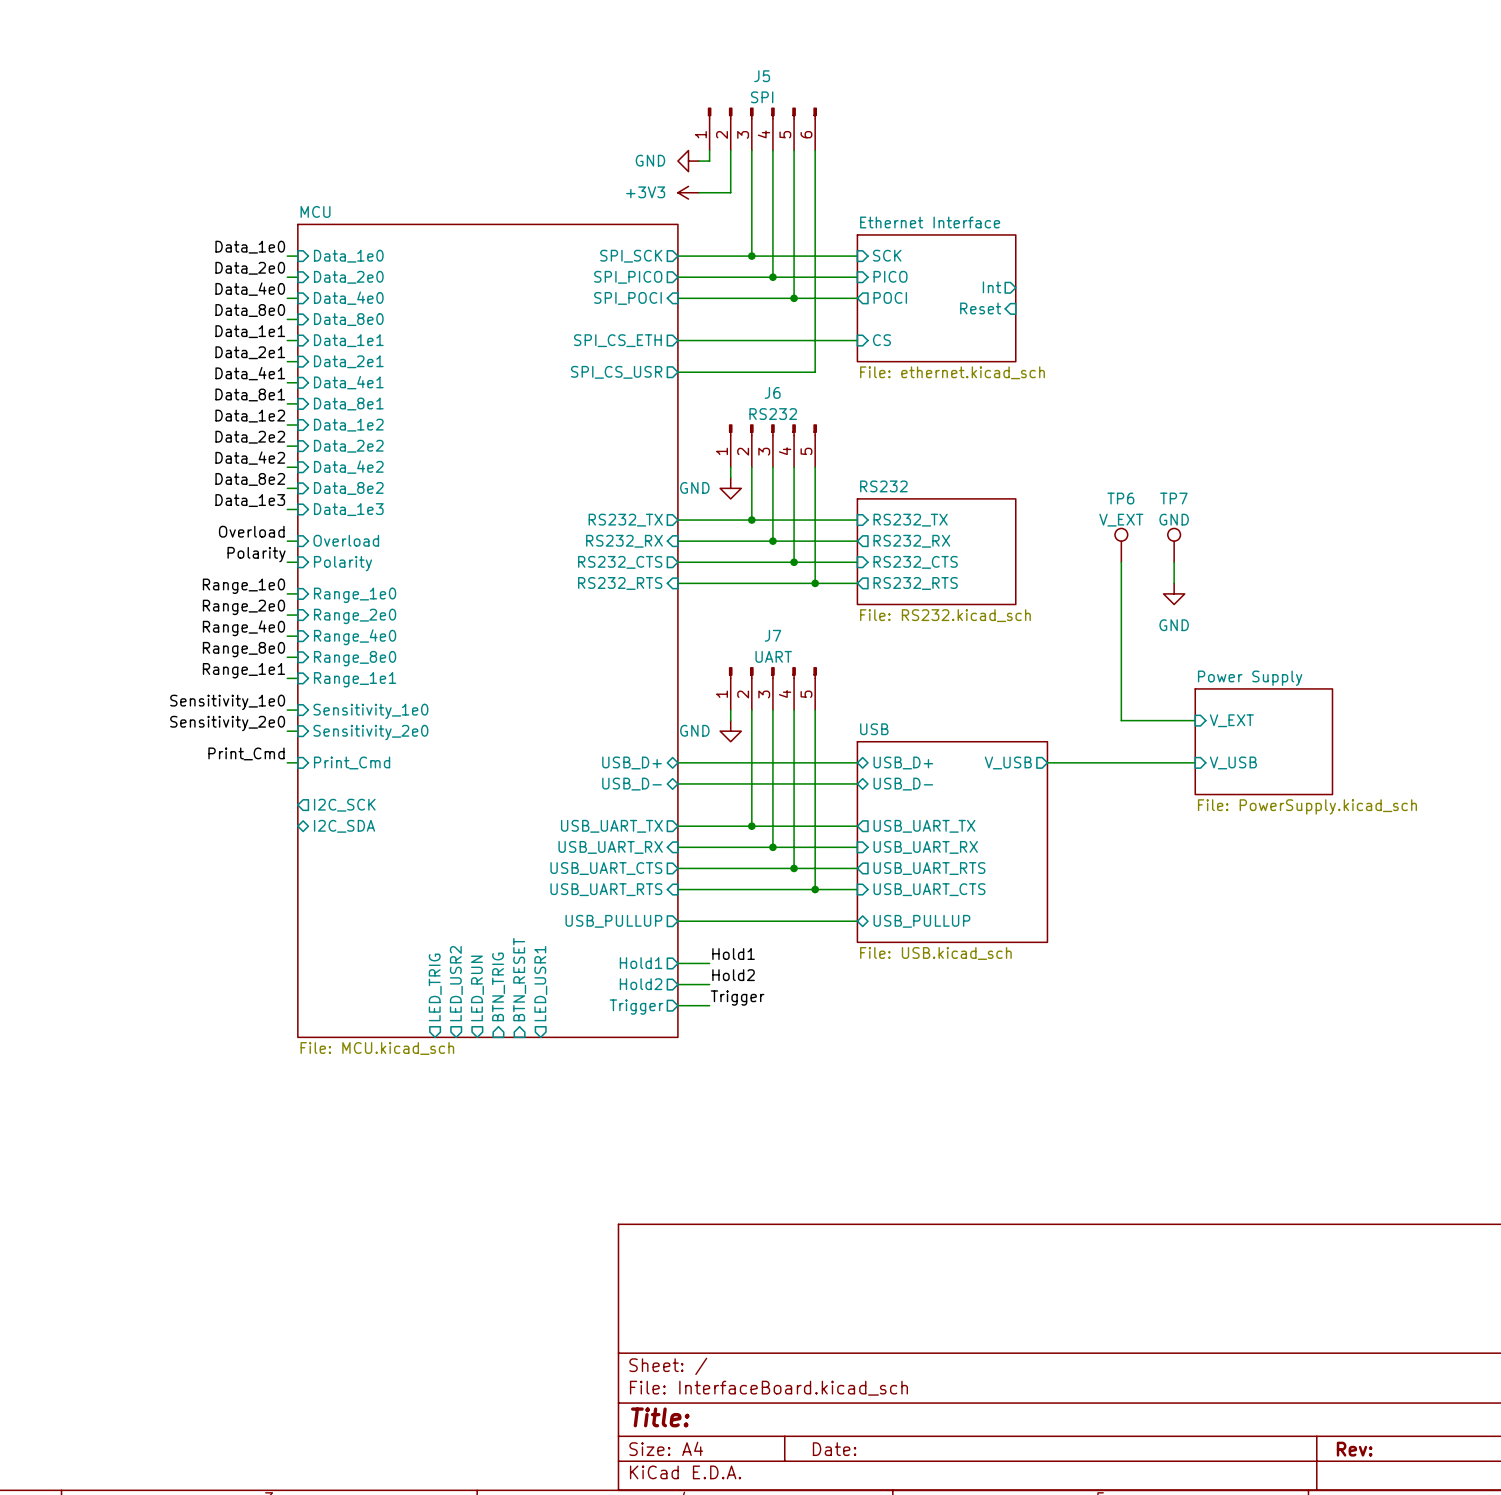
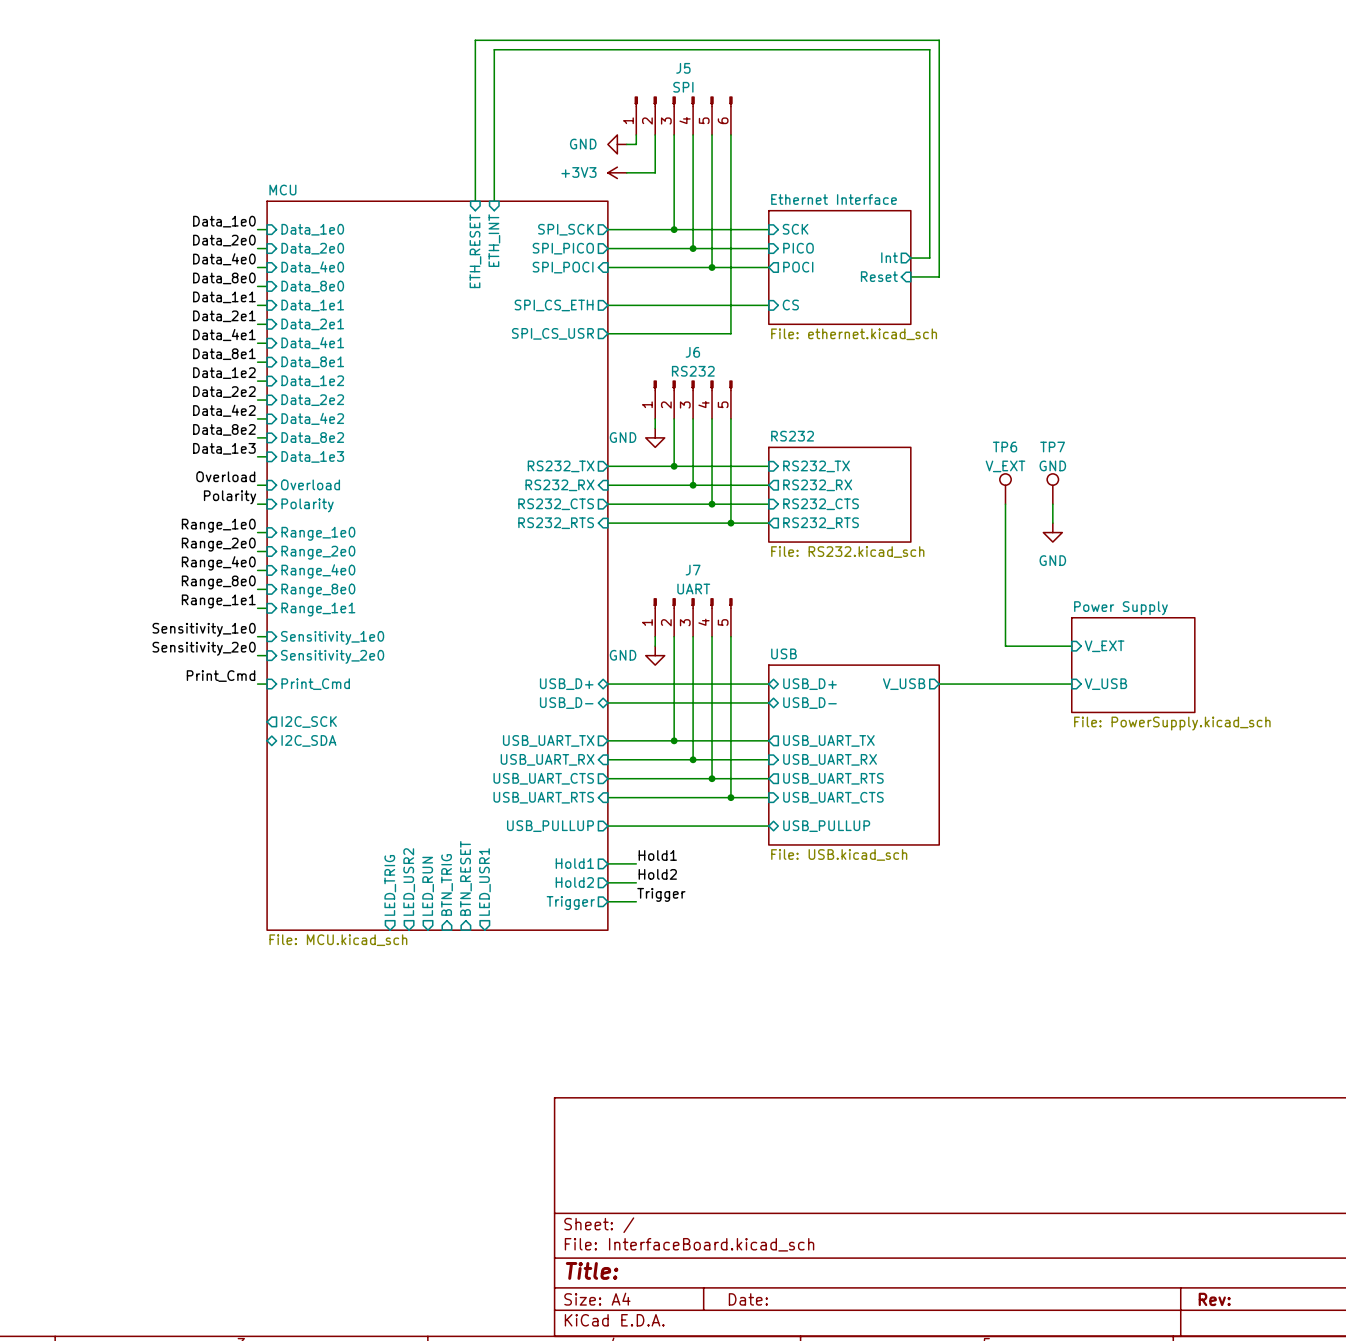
wire: none -> (475, 201) (475, 40) (939, 40) (939, 276) (910, 276)
wire: none -> (494, 201) (494, 49) (929, 49) (929, 258) (910, 258)
sheet pin: none -> ETH_INT (494, 240)
sheet pin: none -> ETH_RESET (475, 251)

